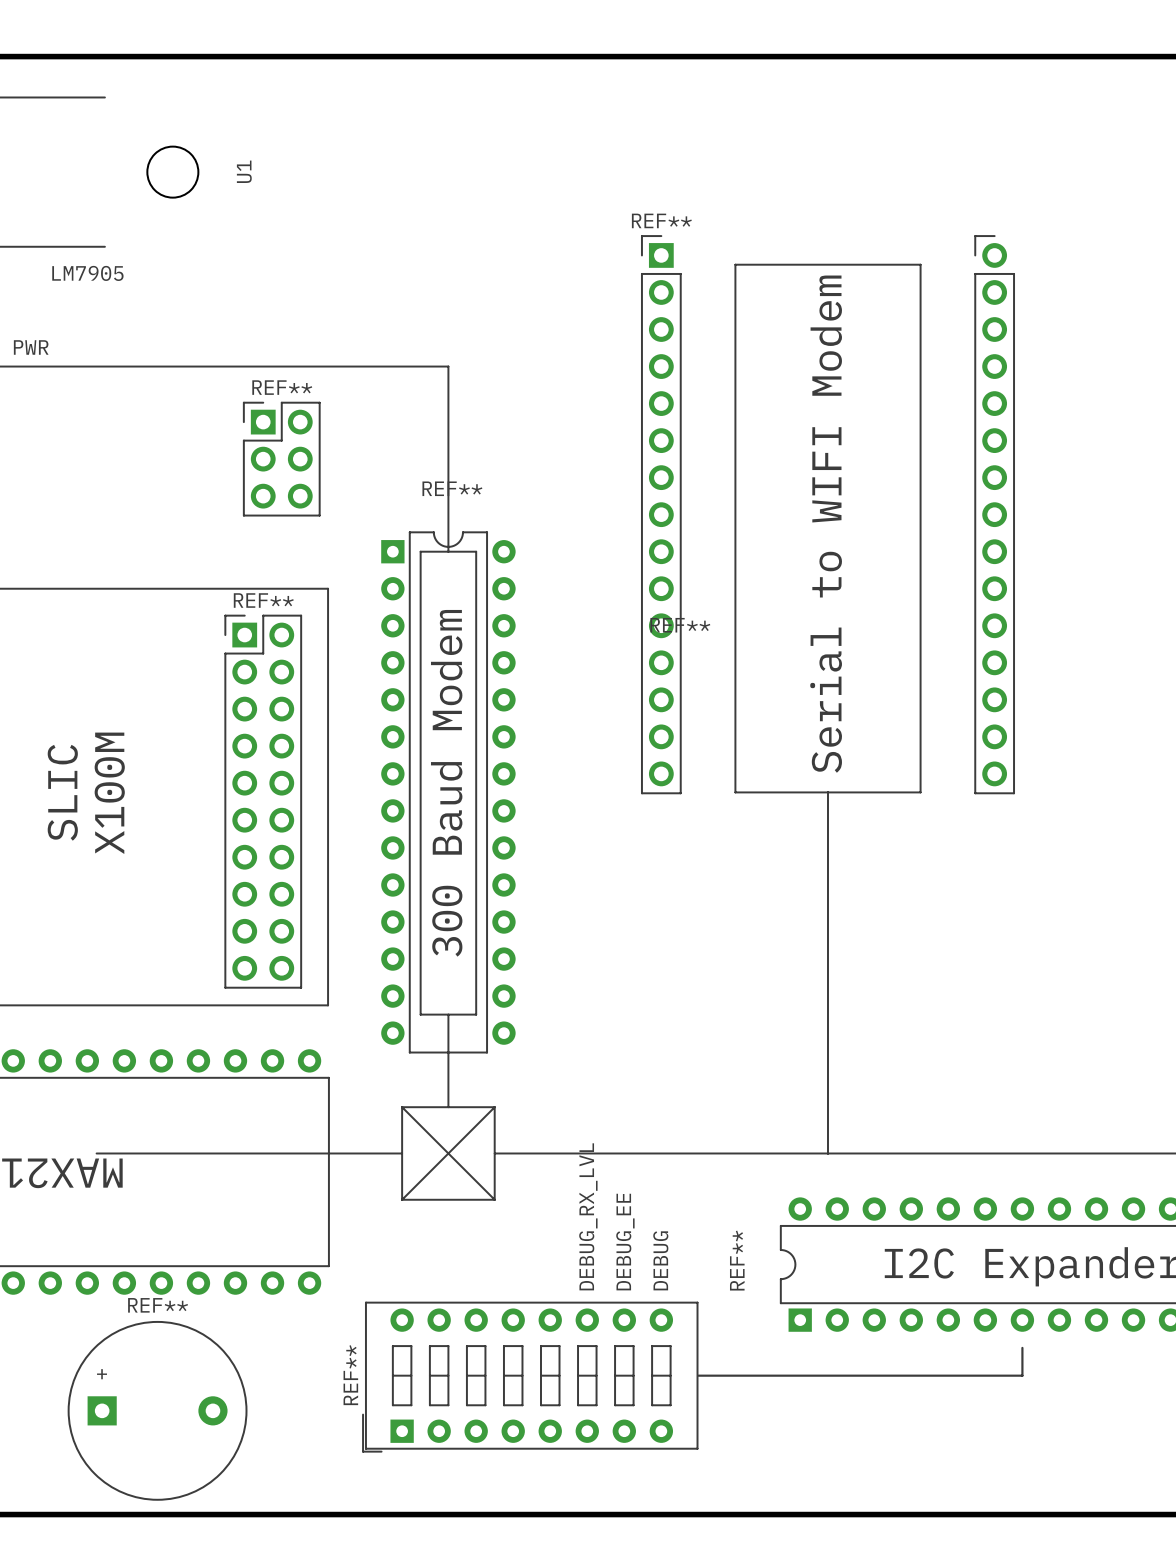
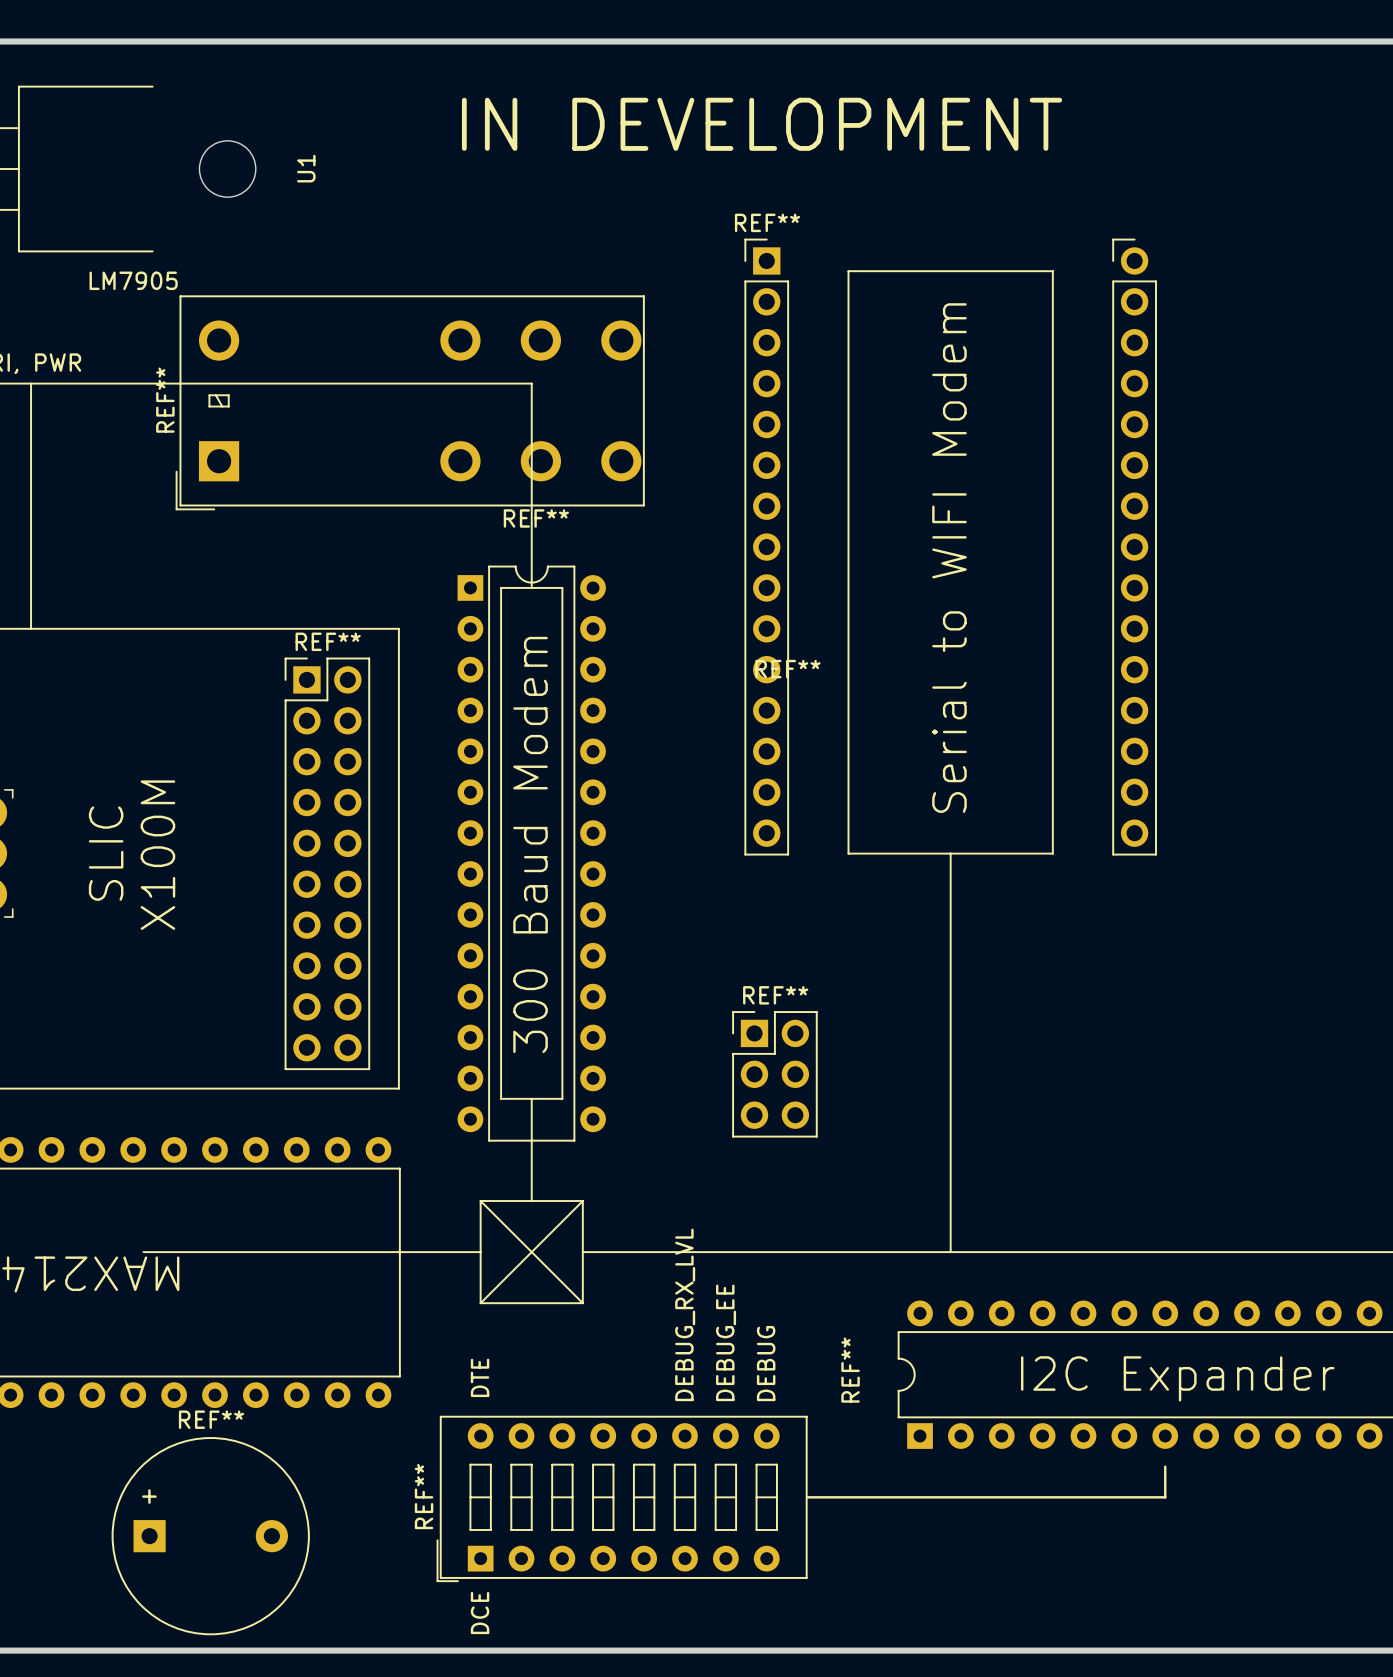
text: none -> IN DEVELOPMENT (762, 124)
REF**: none -> (410, 402)
REF**: (281, 459) -> none
REF**: none -> (774, 1074)
text: none -> DTE (480, 1377)
text: none -> DCE (480, 1612)

